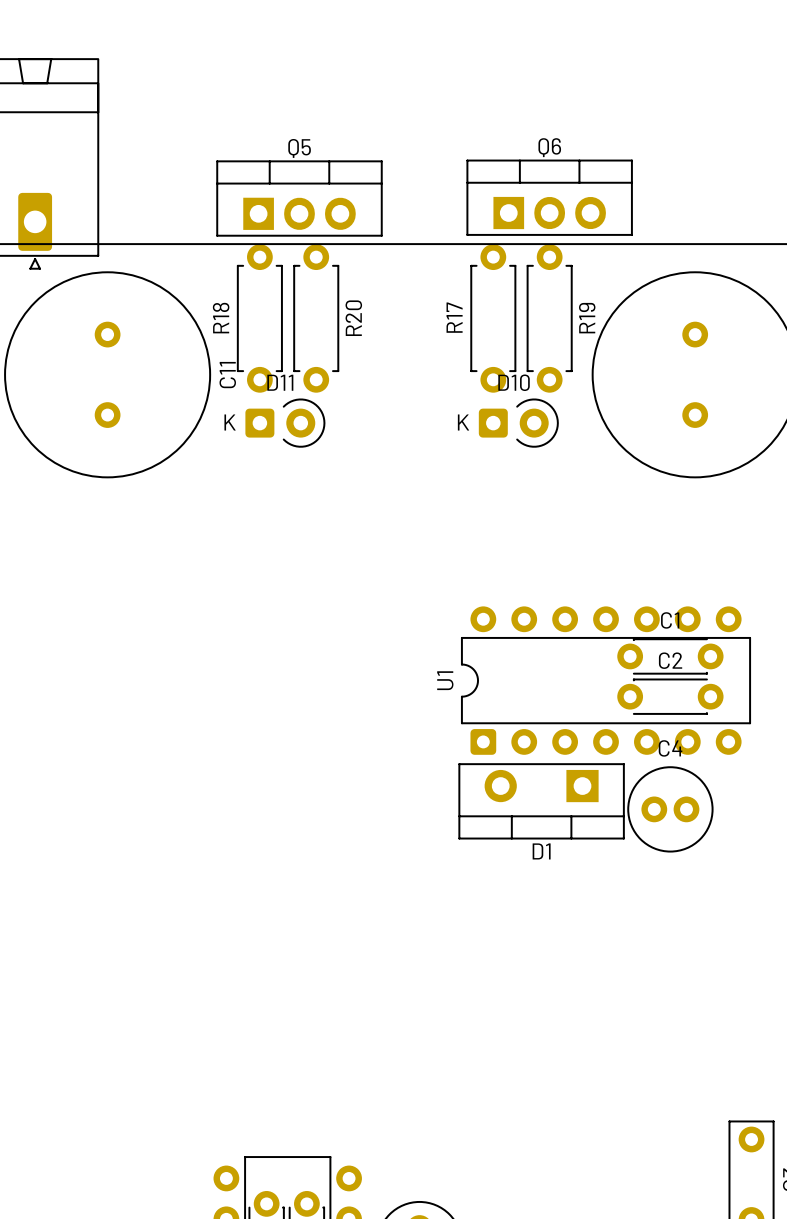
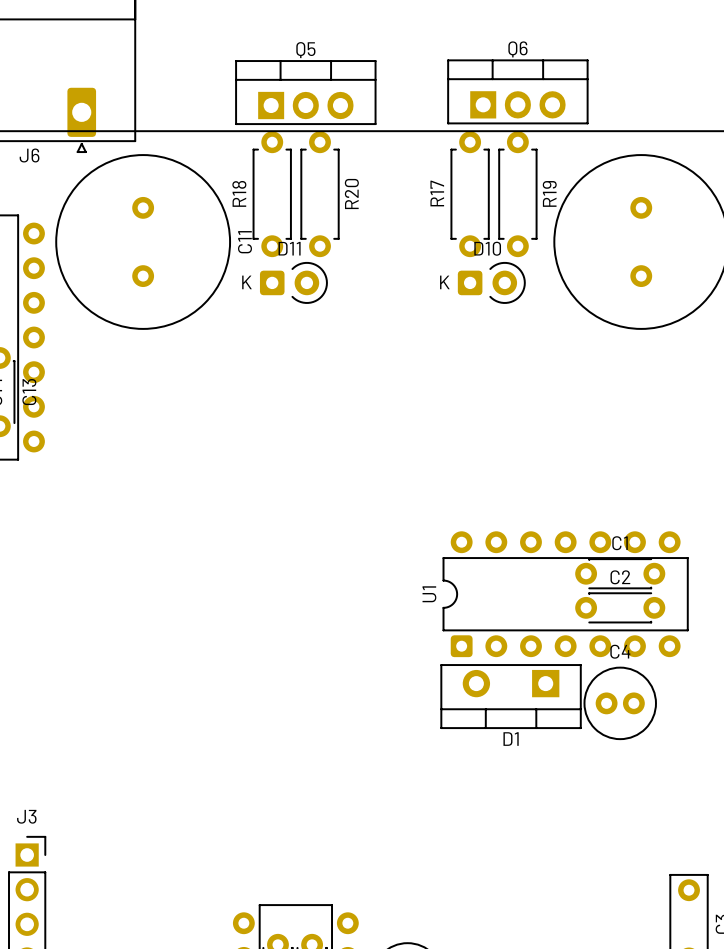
C1 position: (670, 656) -> (620, 573)
U1 position: (606, 680) -> (565, 594)
C2 position: (670, 696) -> (620, 607)
D1 position: (541, 801) -> (511, 696)
C4 position: (670, 809) -> (620, 703)

